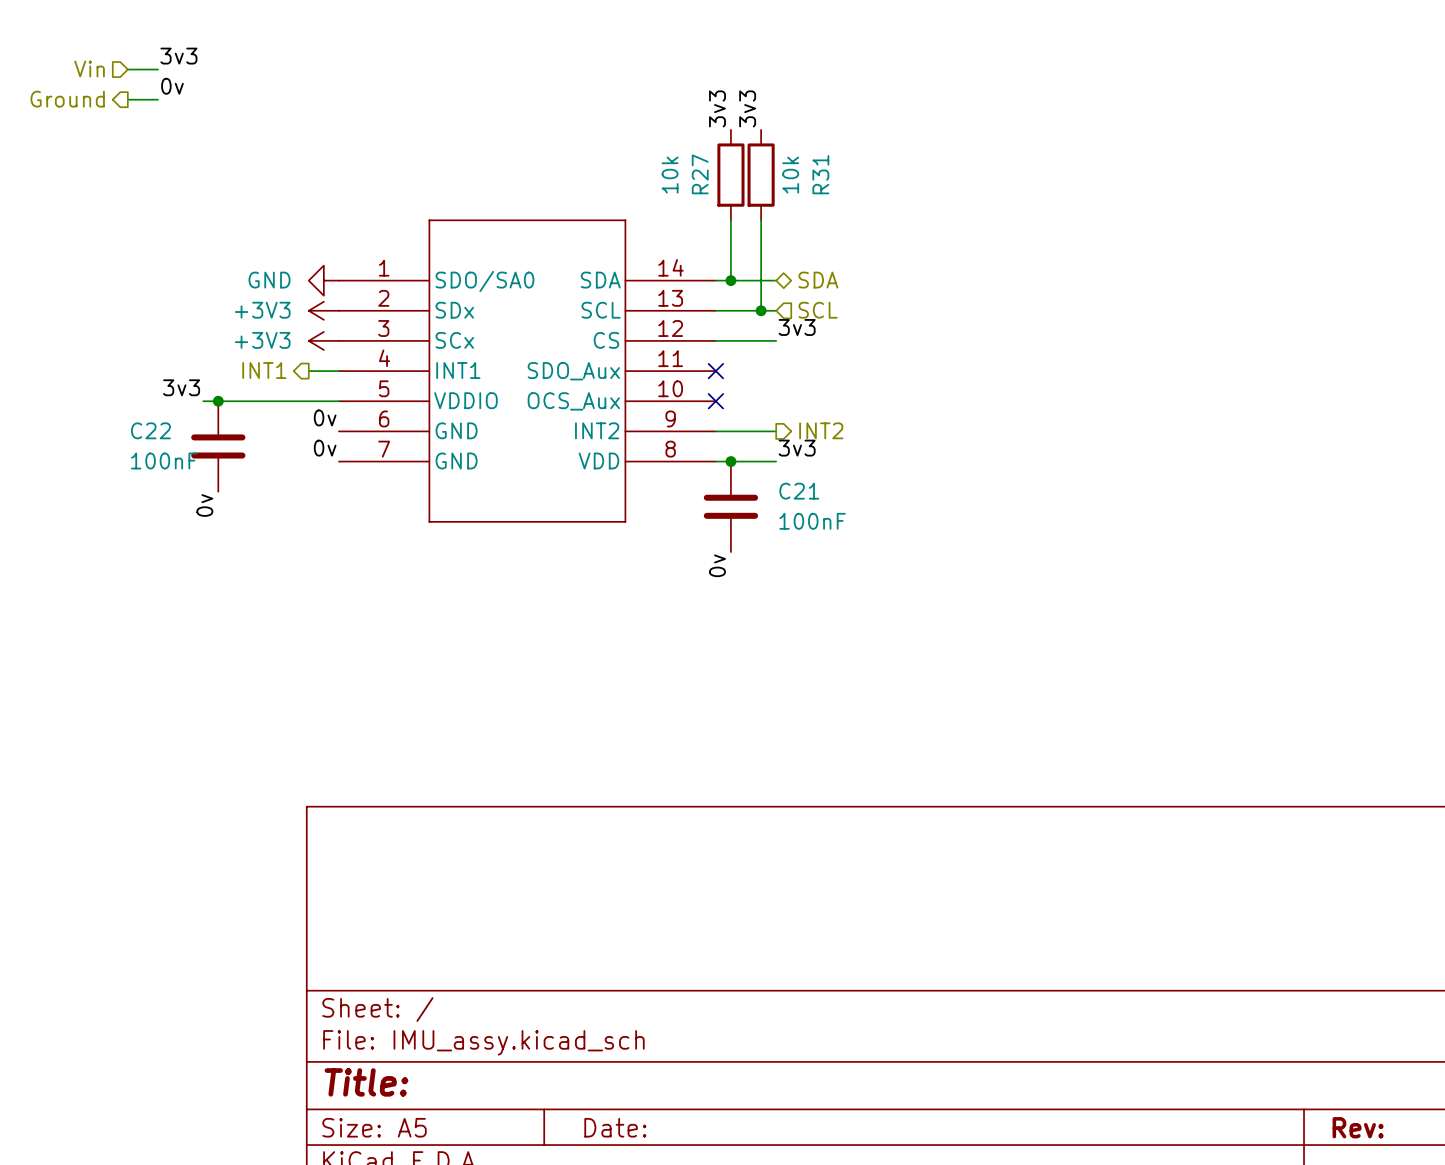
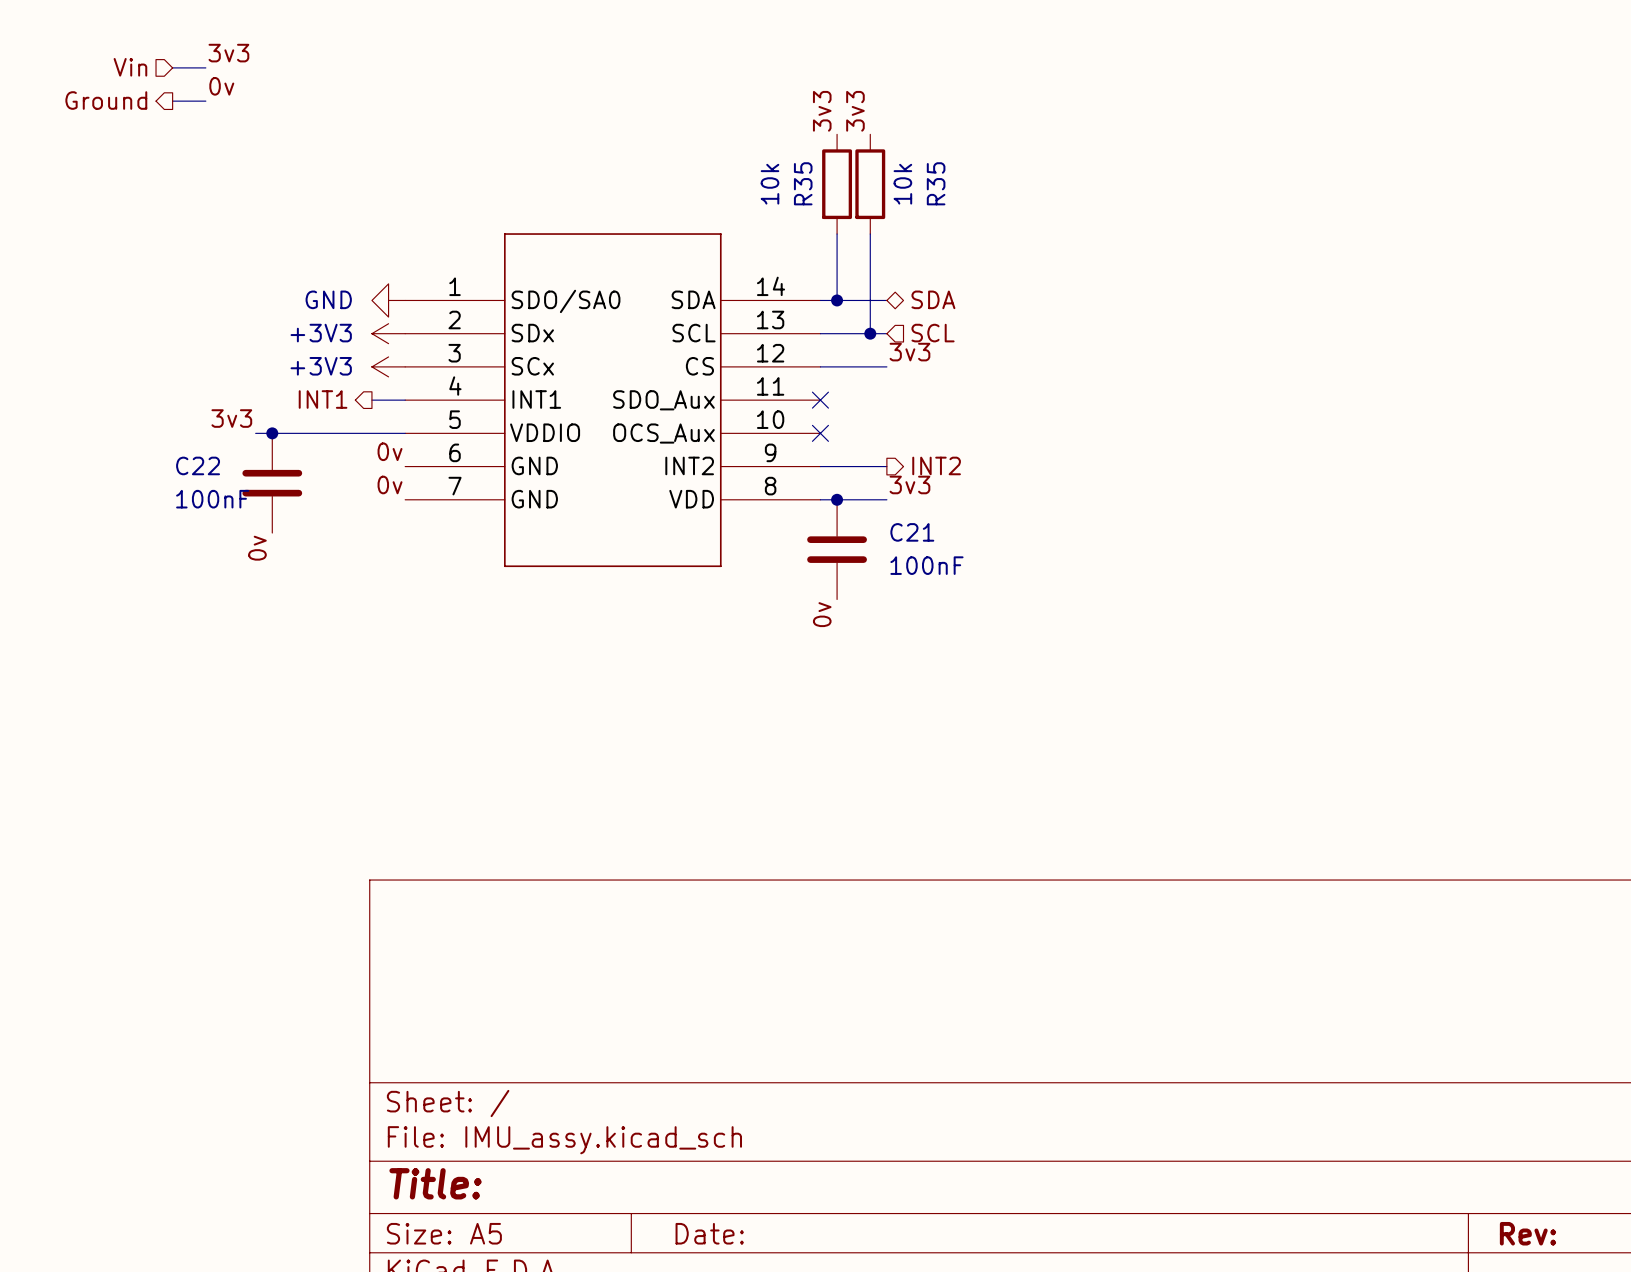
R27 name: R27 (700, 174) -> R35 (803, 183)
R31 name: R31 (820, 174) -> R35 (936, 183)

